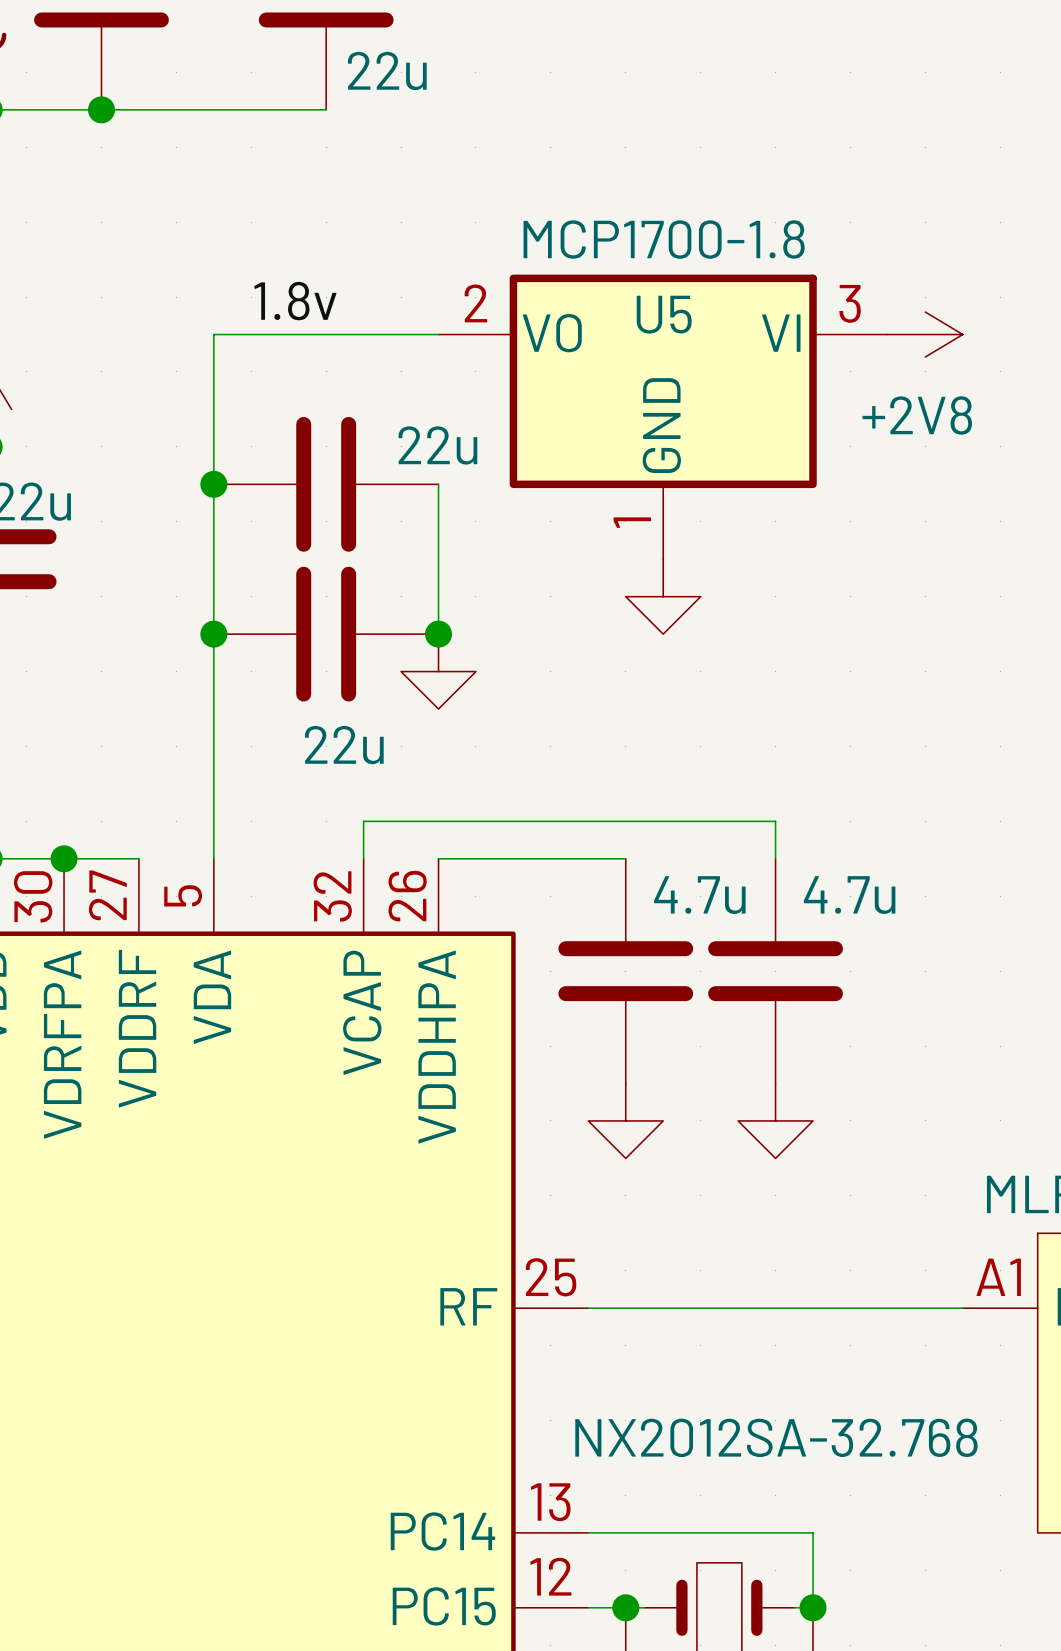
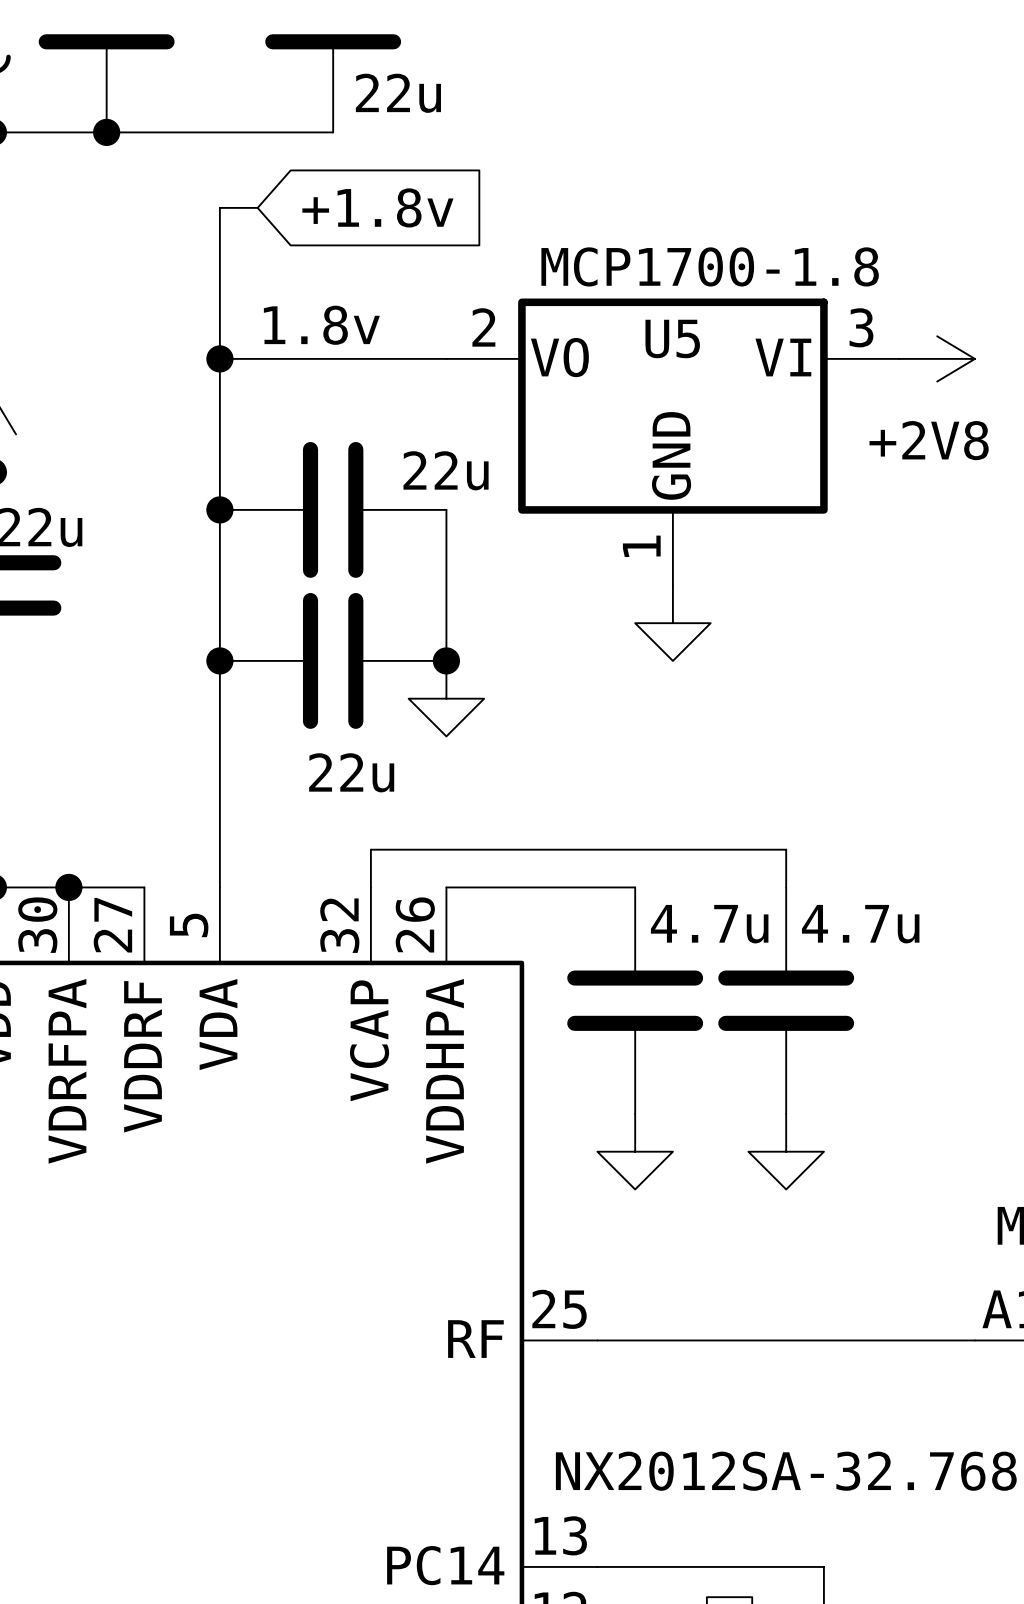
wire: none -> (257, 207) (219, 207) (219, 358)
global label: none -> +1.8v (377, 207)
U5 value position: MCP1700-1.8 (664, 239) -> MCP1700-1.8 (710, 266)
junction: none -> (219, 358)

